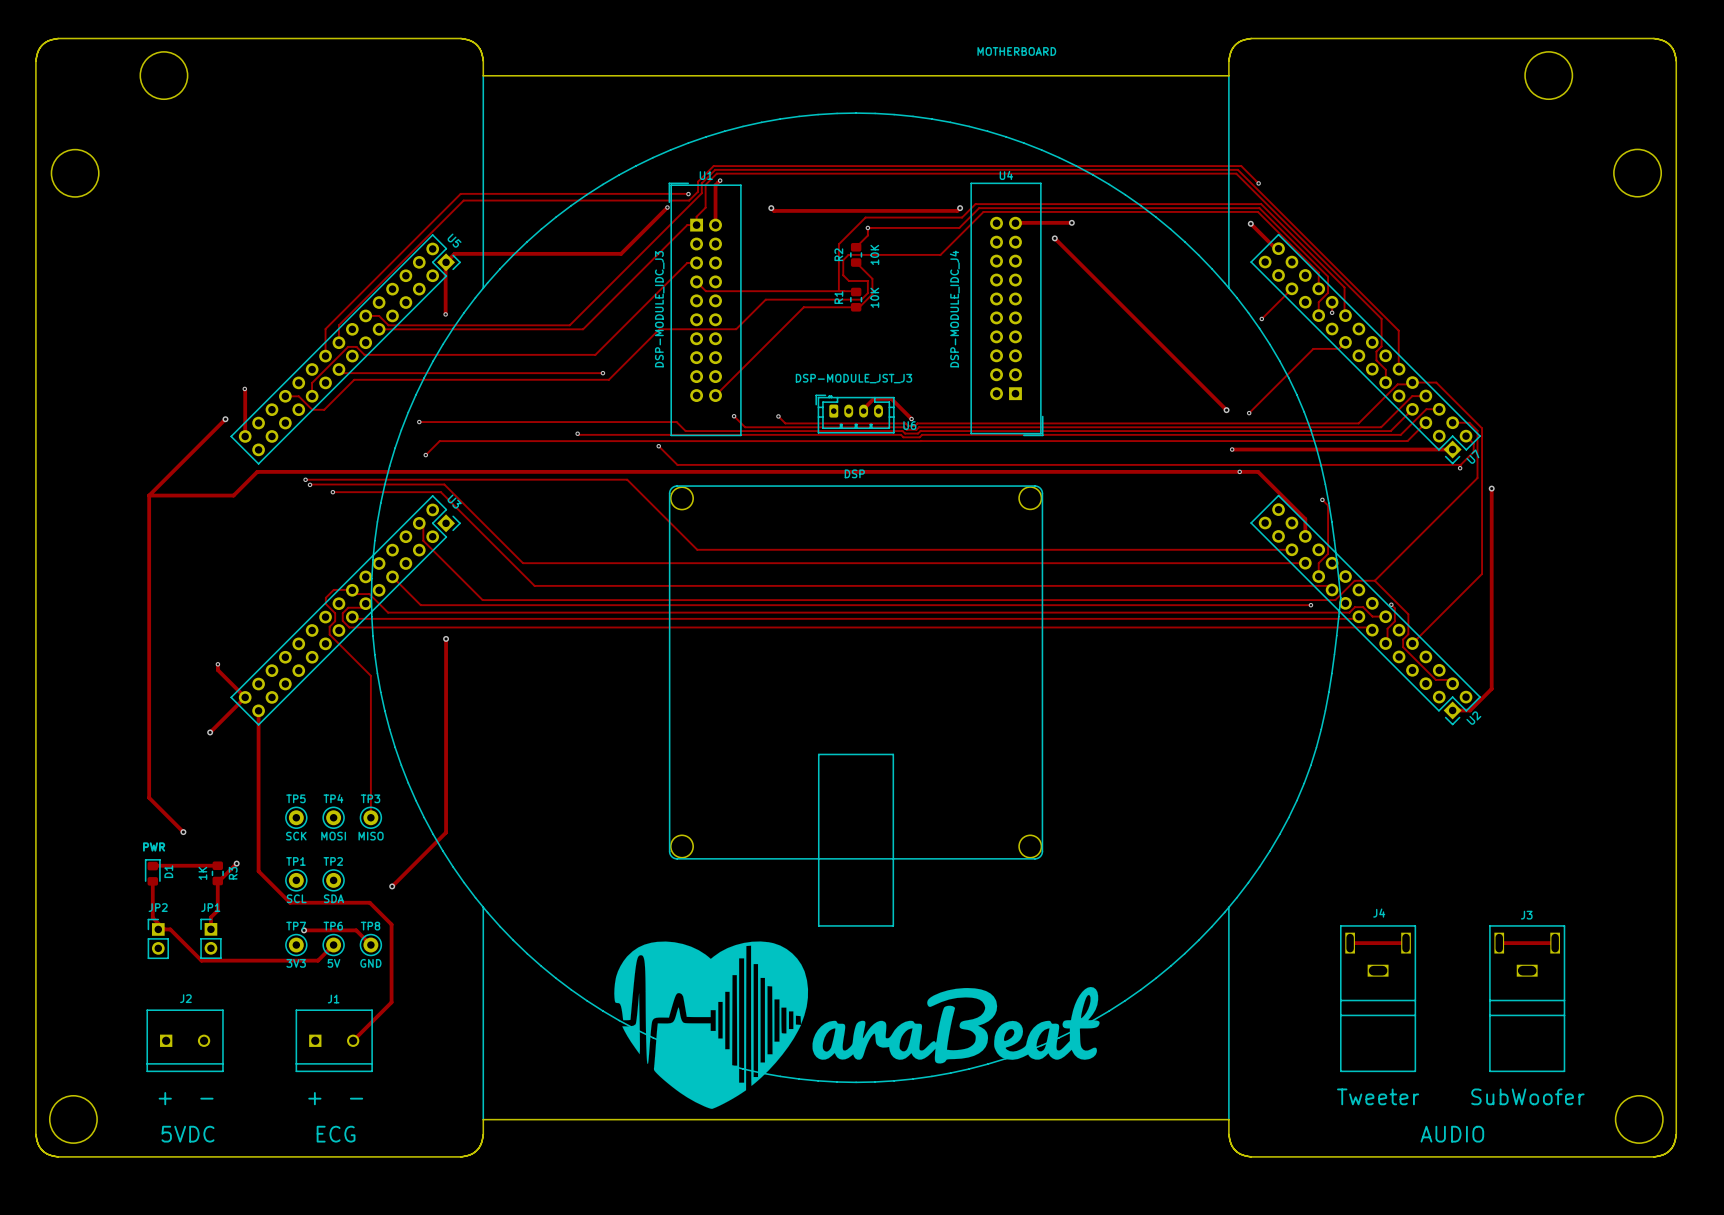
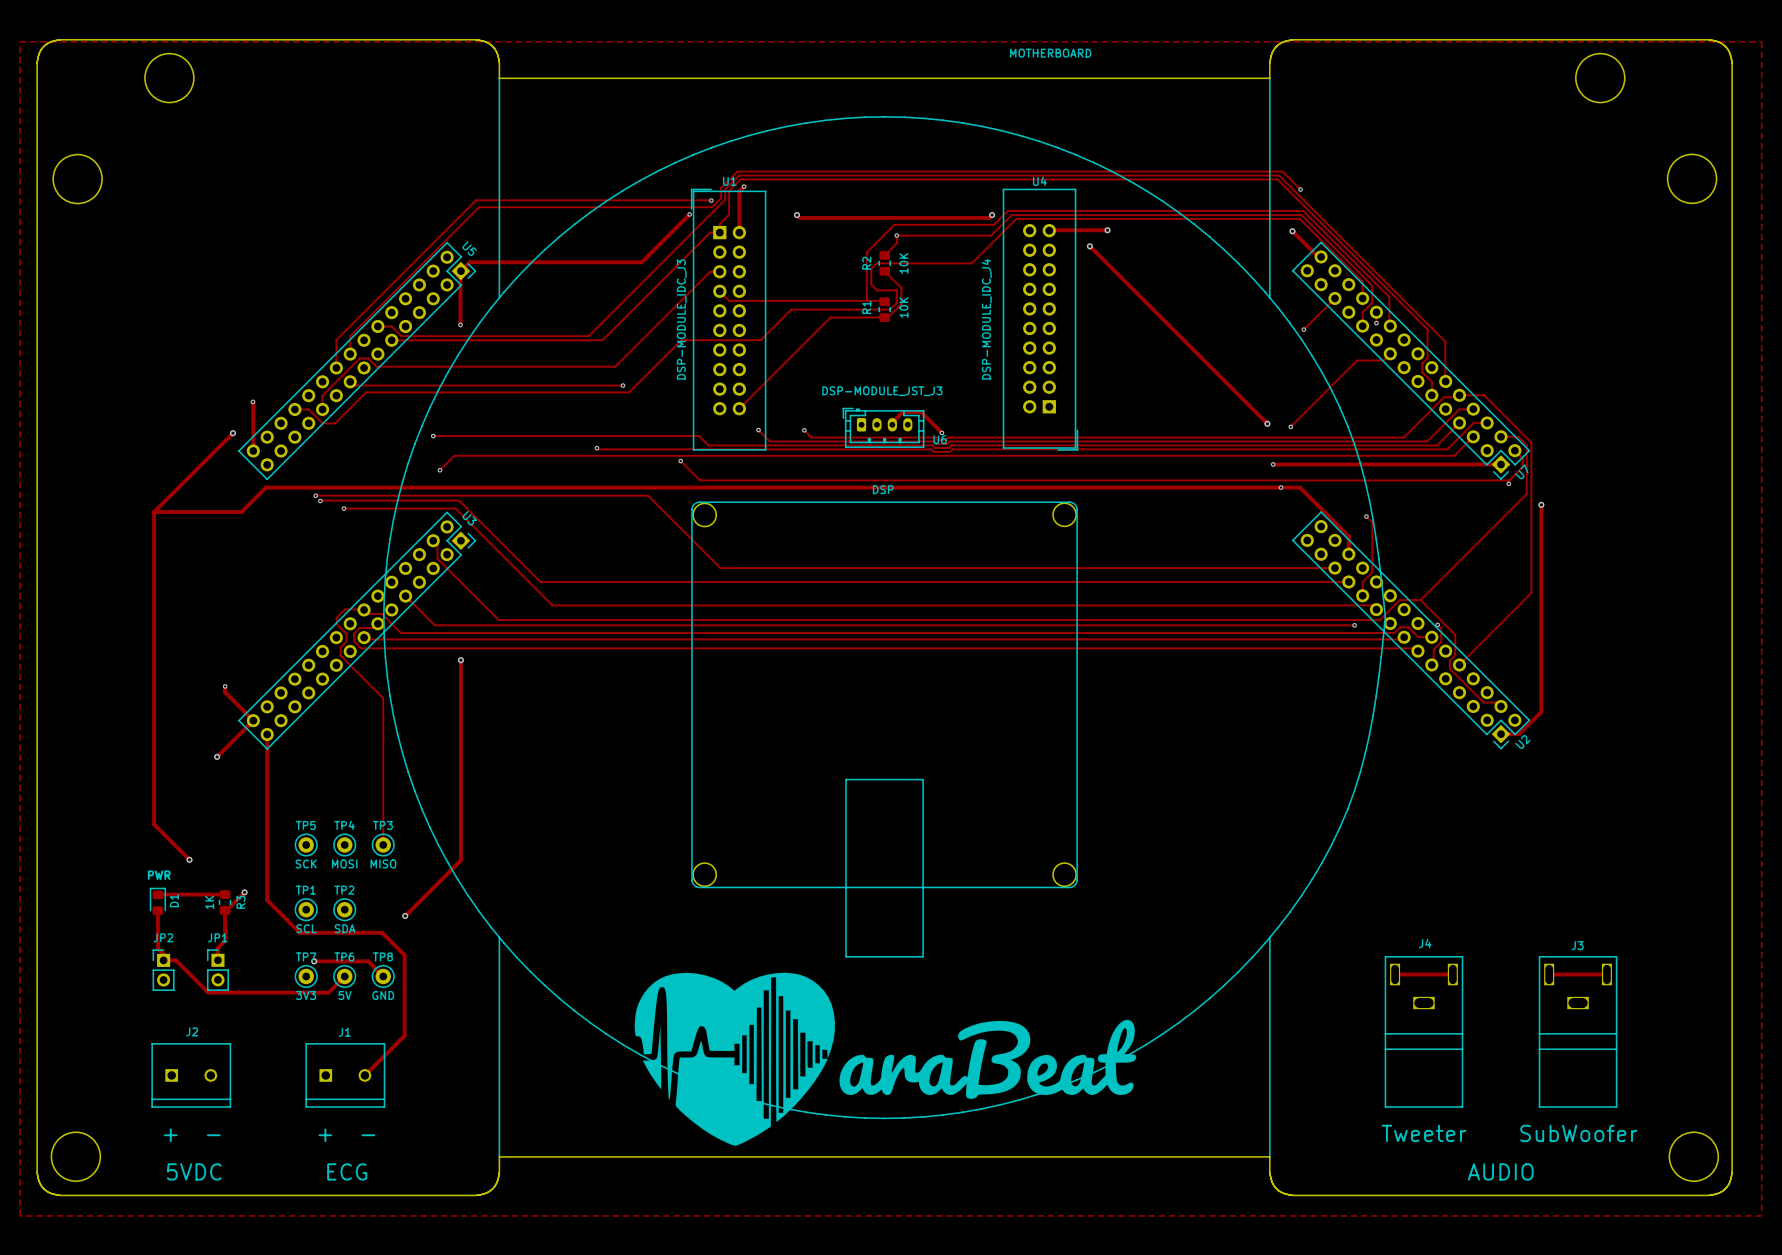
zone outline: none -> (20, 41) (20, 1215) (1761, 1215) (1761, 41) (20, 41)

